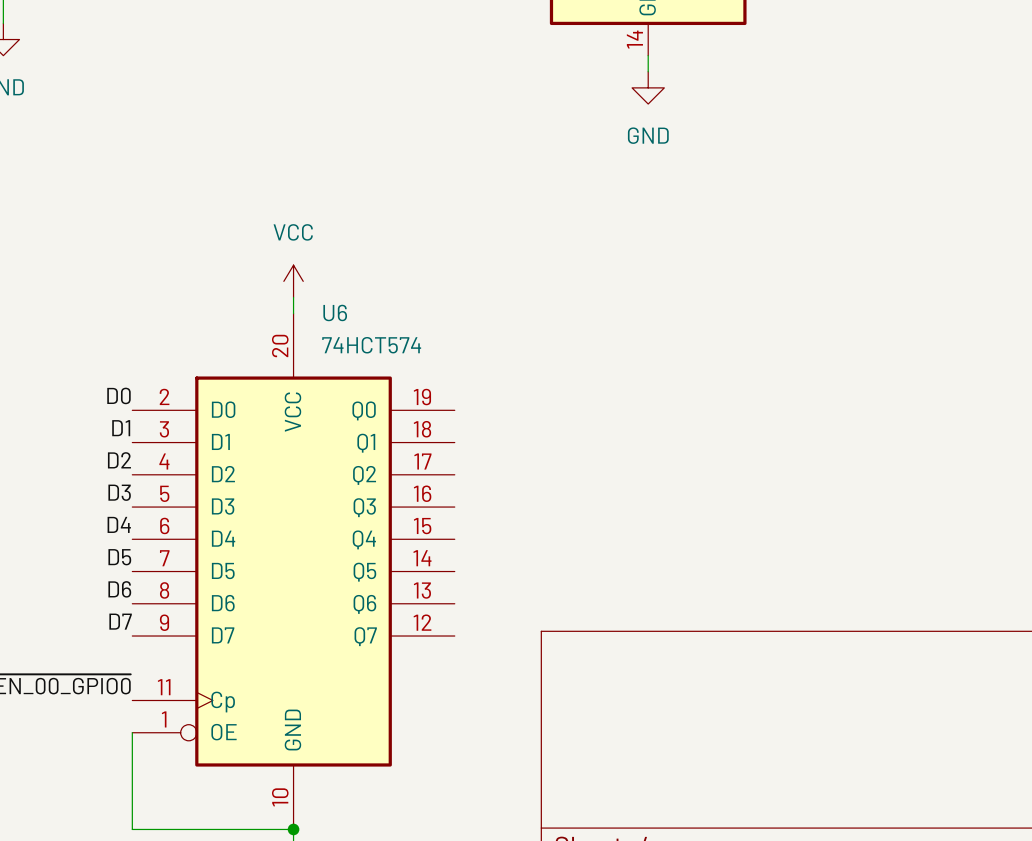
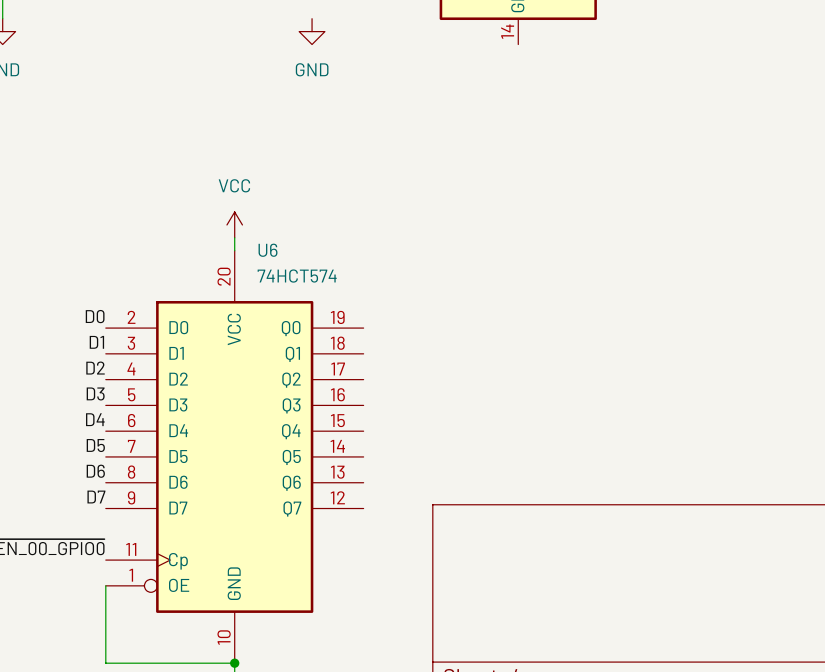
wire: (648, 55) (648, 71) -> none
power symbol position: GND (648, 87) -> GND (312, 31)

